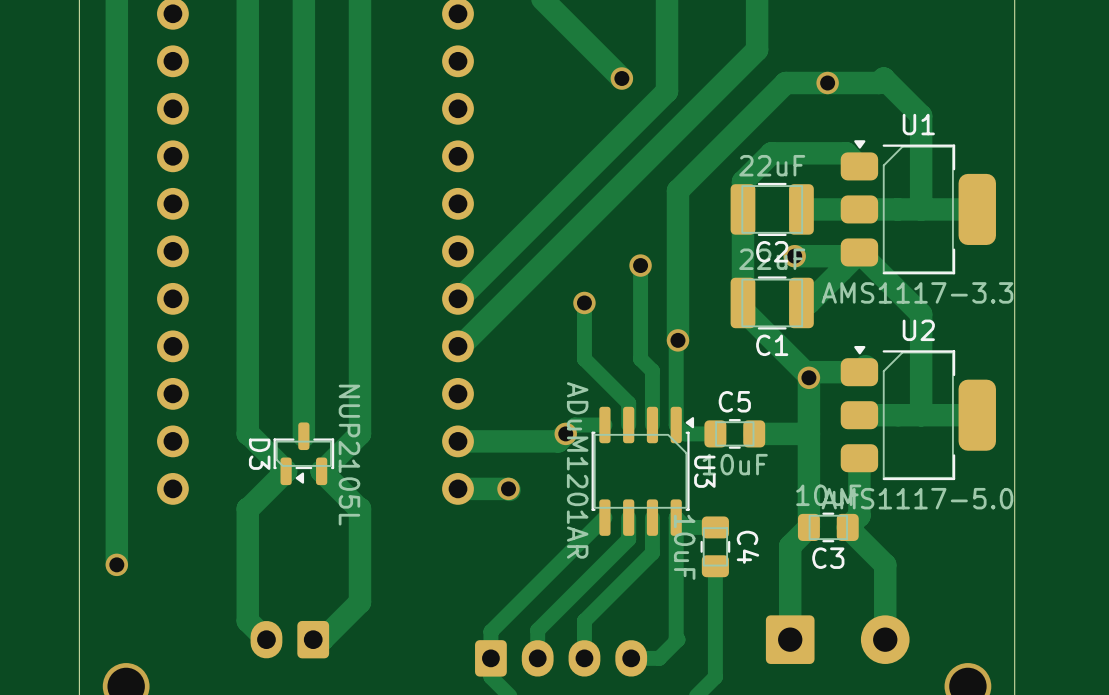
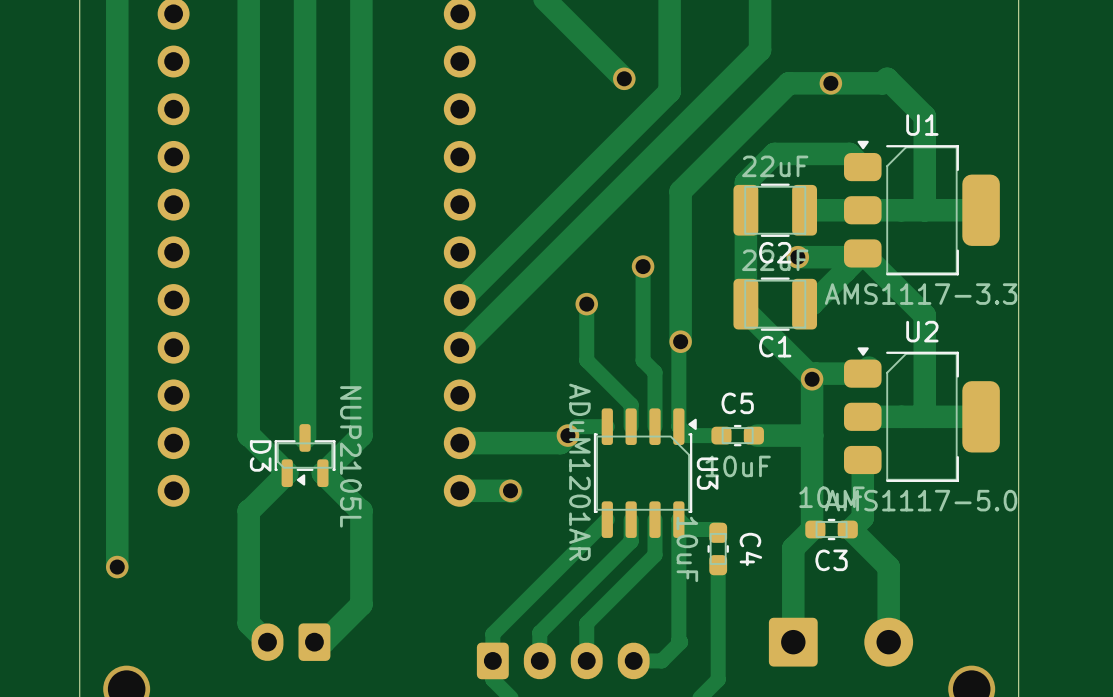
C5 footprint: [704, 419, 766, 449] -> [711, 424, 764, 447]
C3 footprint: [797, 512, 859, 543] -> [805, 518, 858, 541]
C4 footprint: [700, 516, 731, 578] -> [707, 522, 729, 576]

